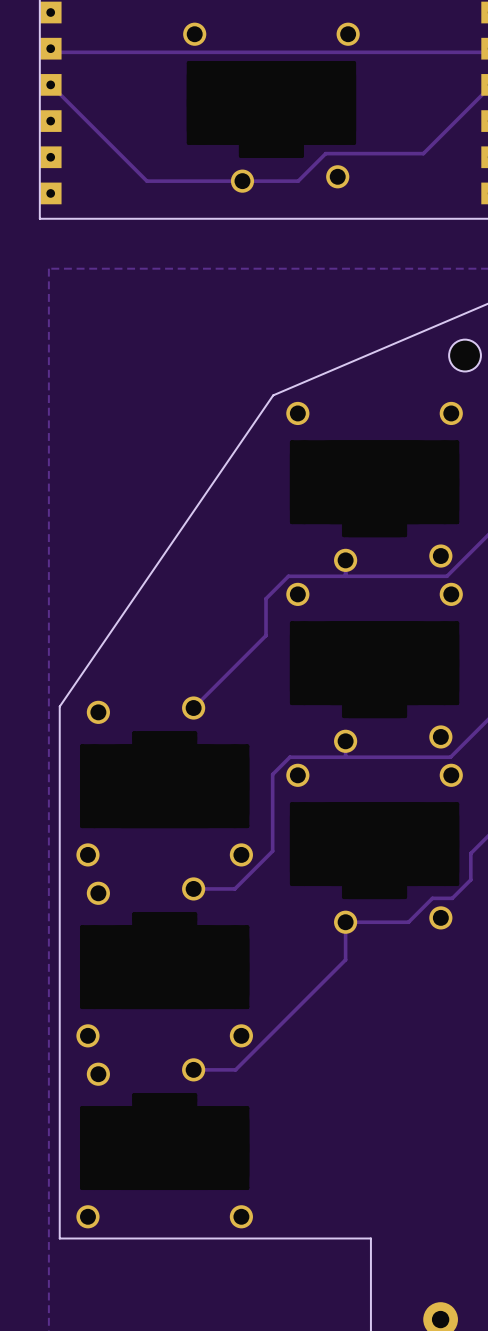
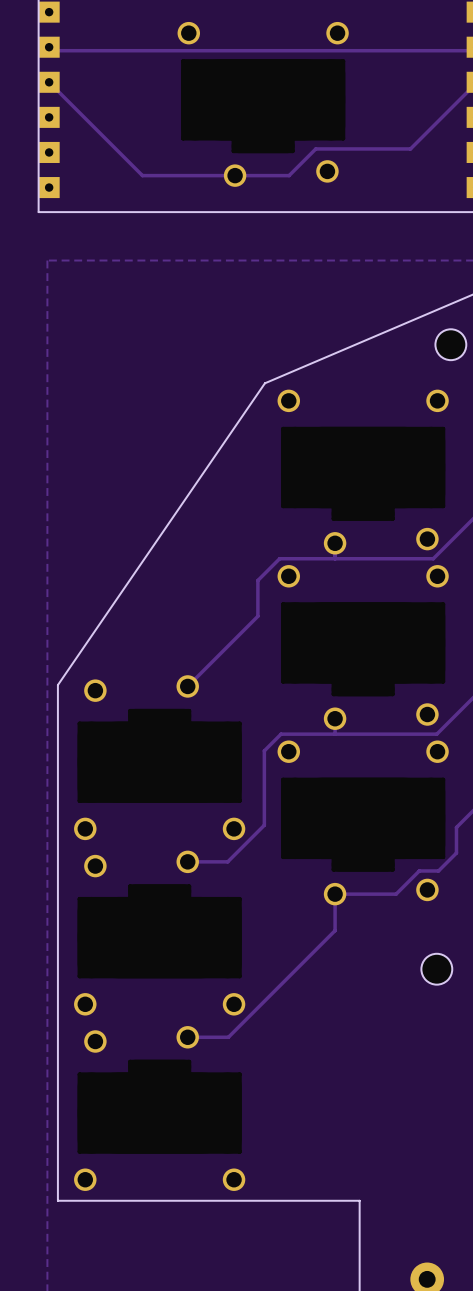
part: none -> (436, 969)

